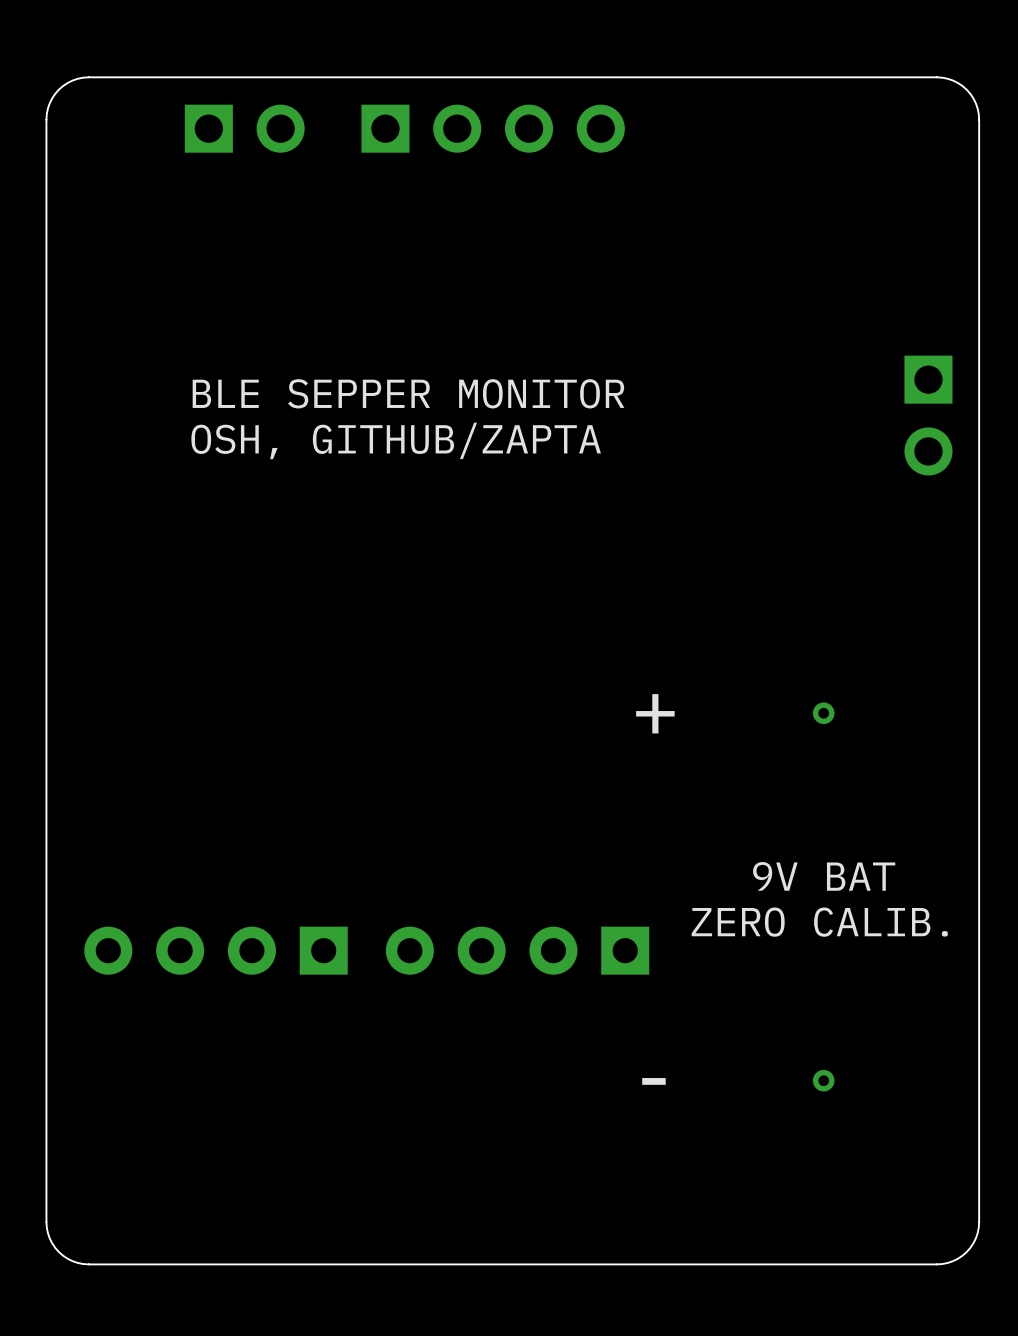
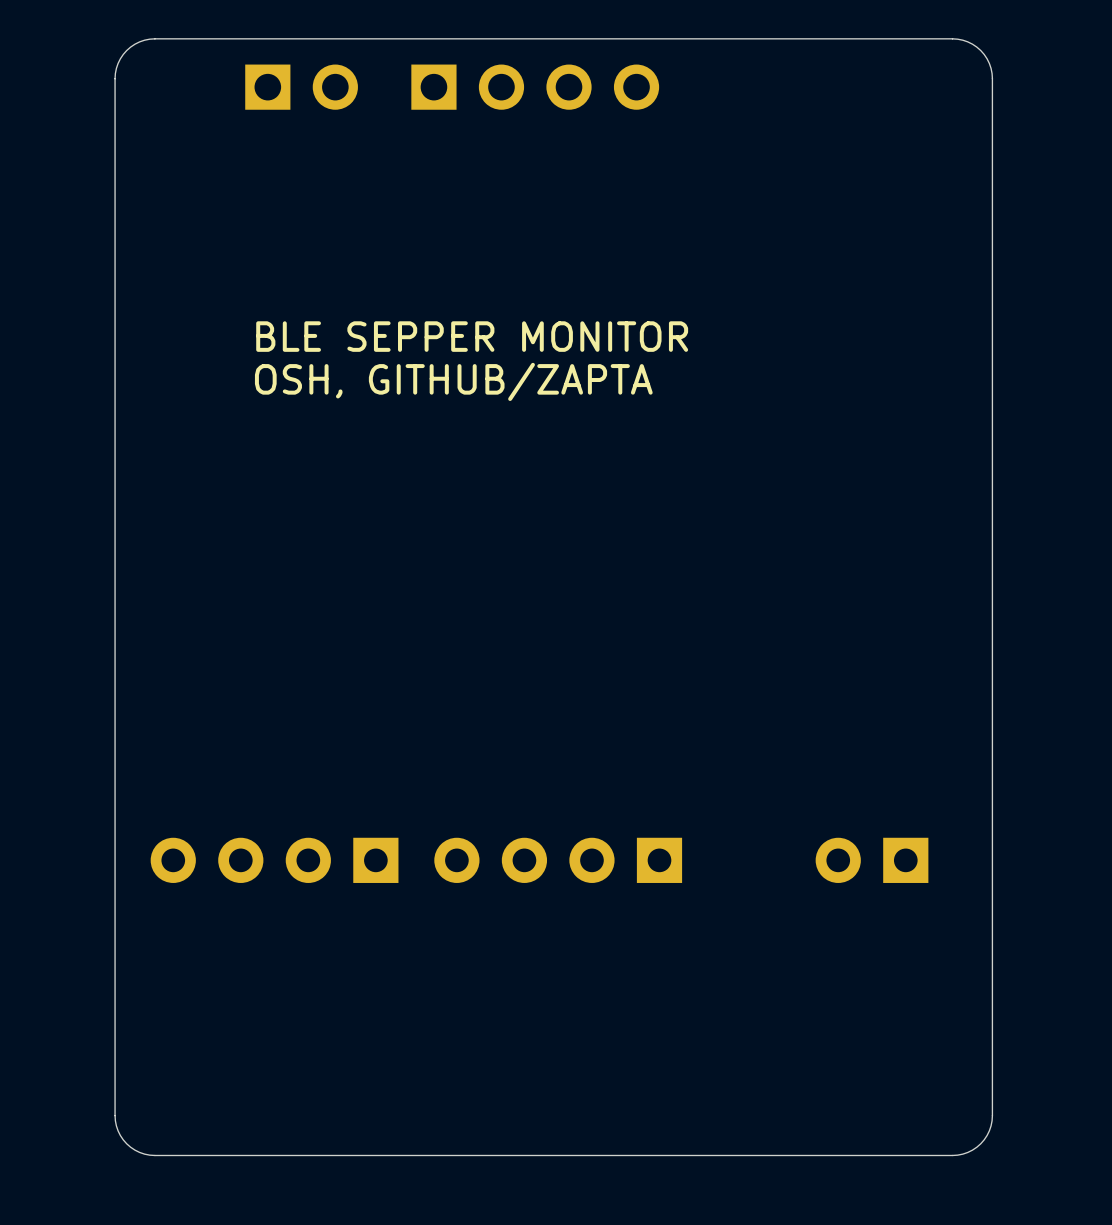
part: (928, 415) -> none
text: + (655, 713) -> none
part: (823, 713) -> none
text: 9V BAT (824, 876) -> none
text: ZERO CALIB. (819, 922) -> none
part: none -> (872, 860)
part: (823, 1080) -> none
text: - (653, 1081) -> none

